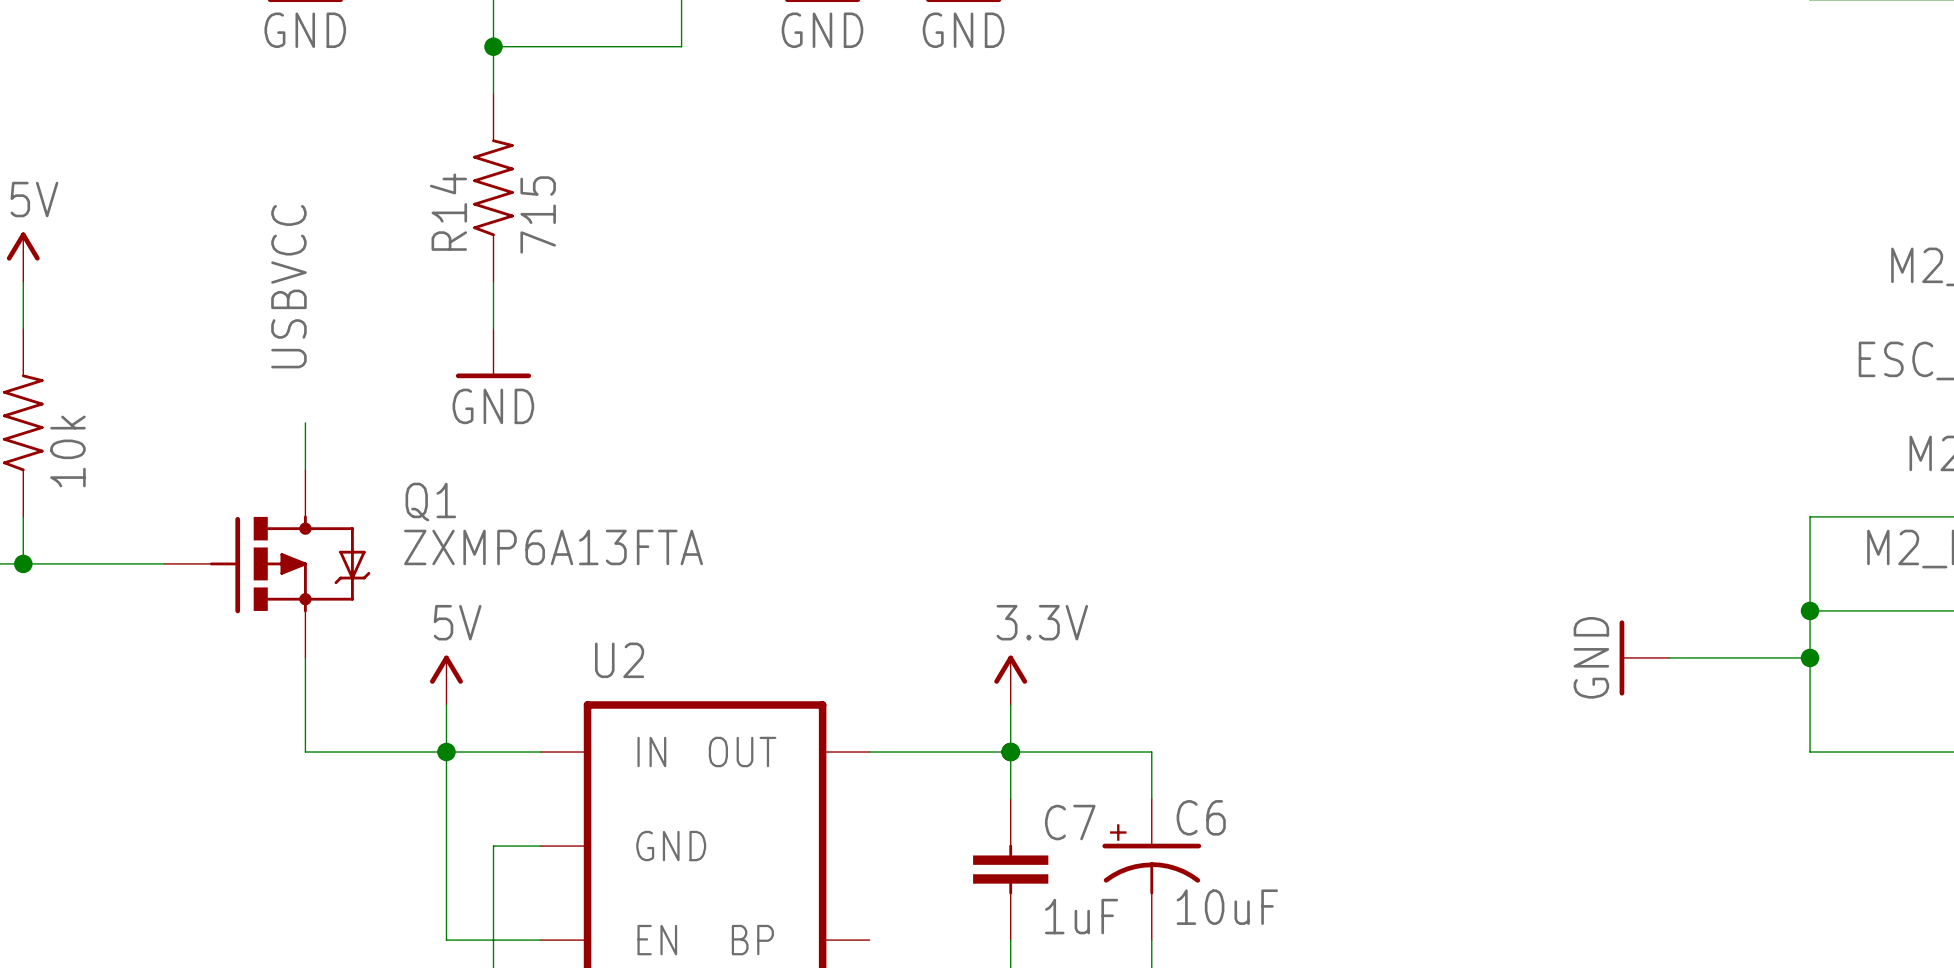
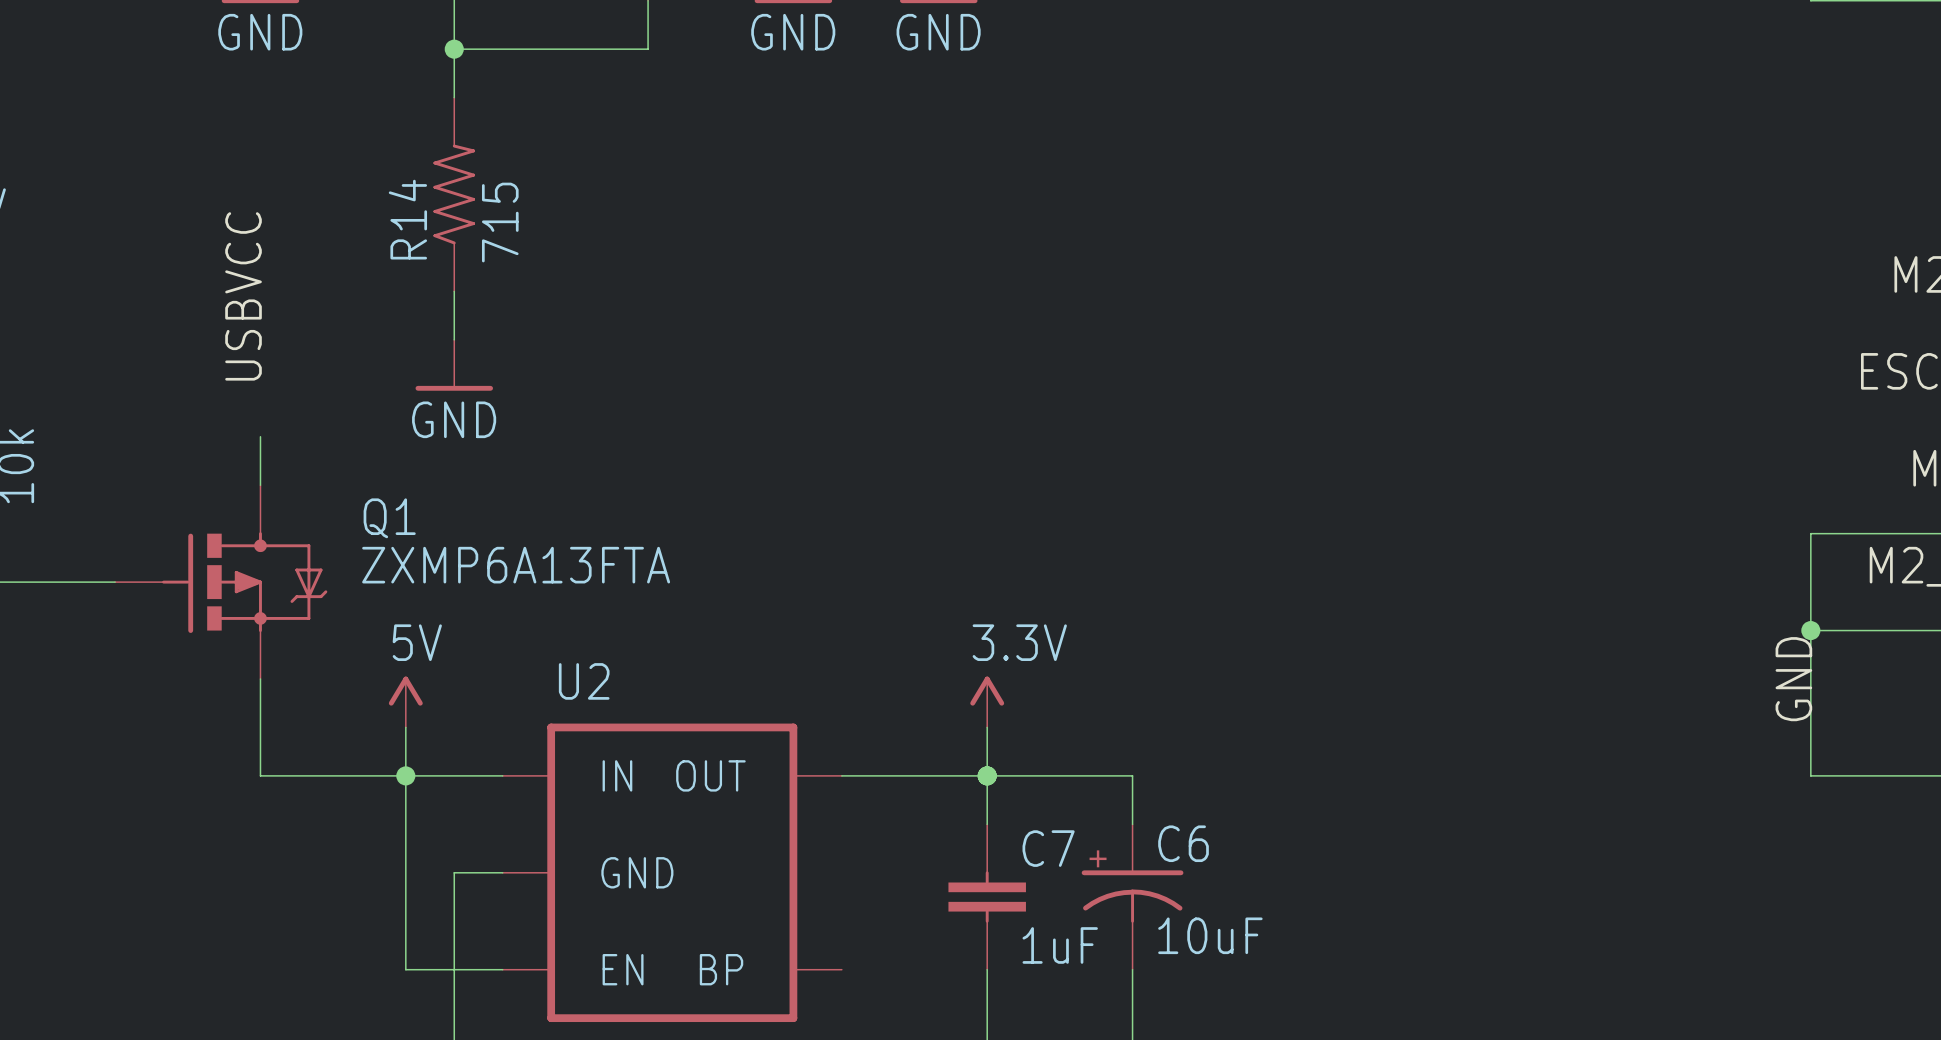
power symbol: GND (1644, 657) -> none
wire: (1668, 657) (1810, 657) -> none
junction: (1810, 657) -> none
label: none -> GND (1793, 679)

